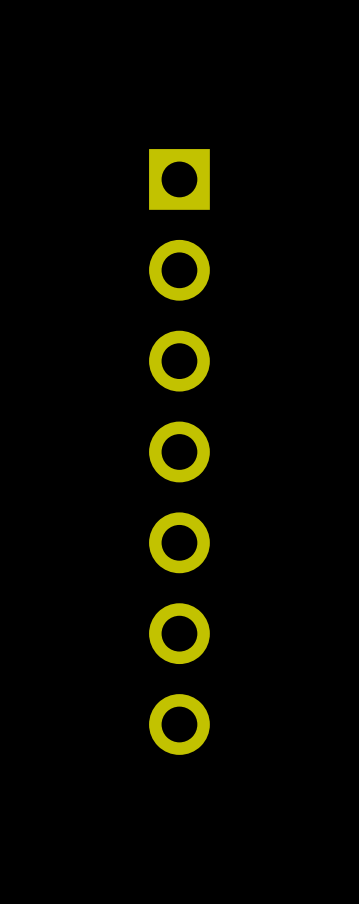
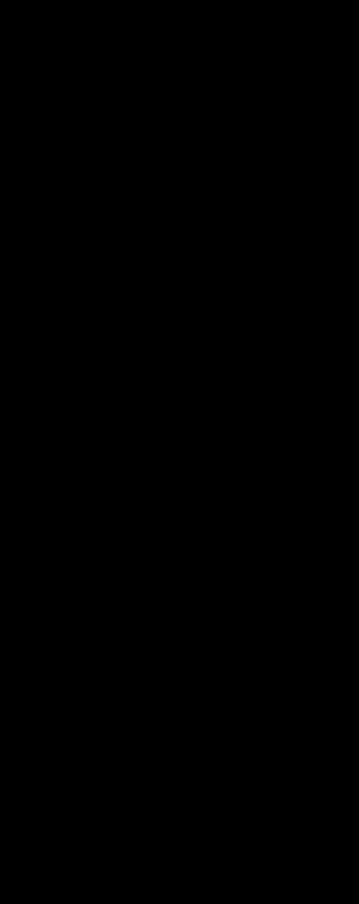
part: (179, 451) -> none

